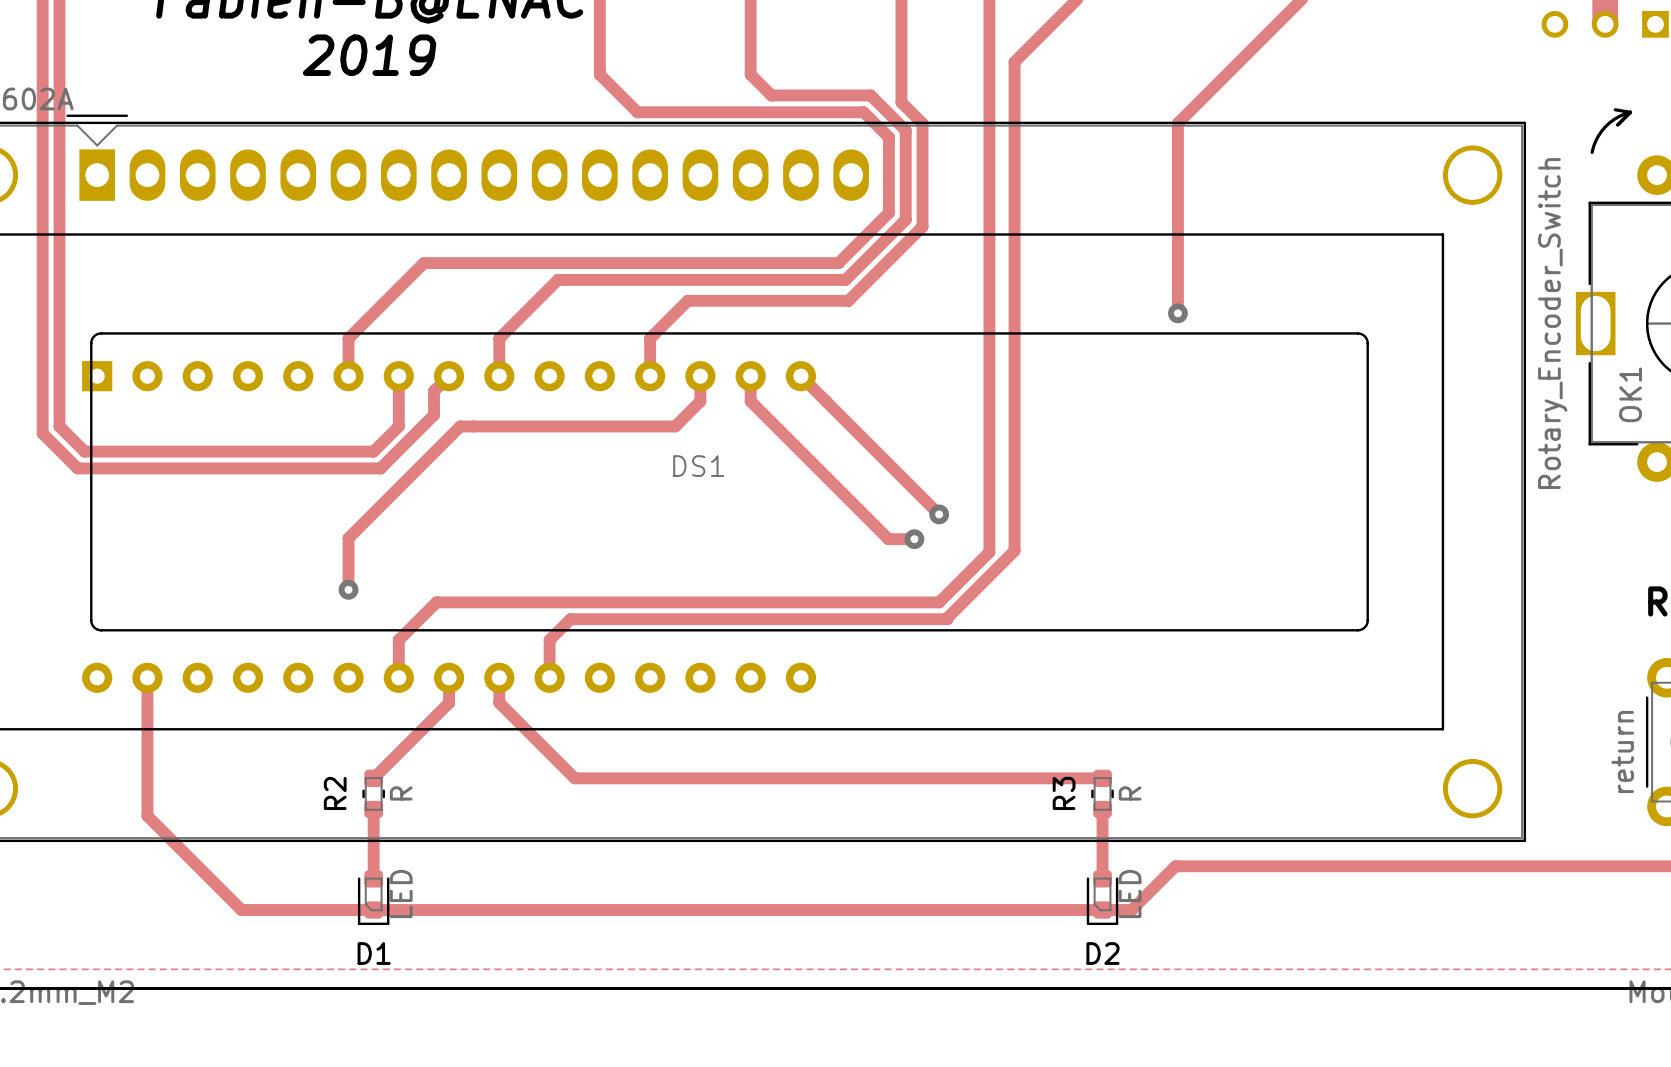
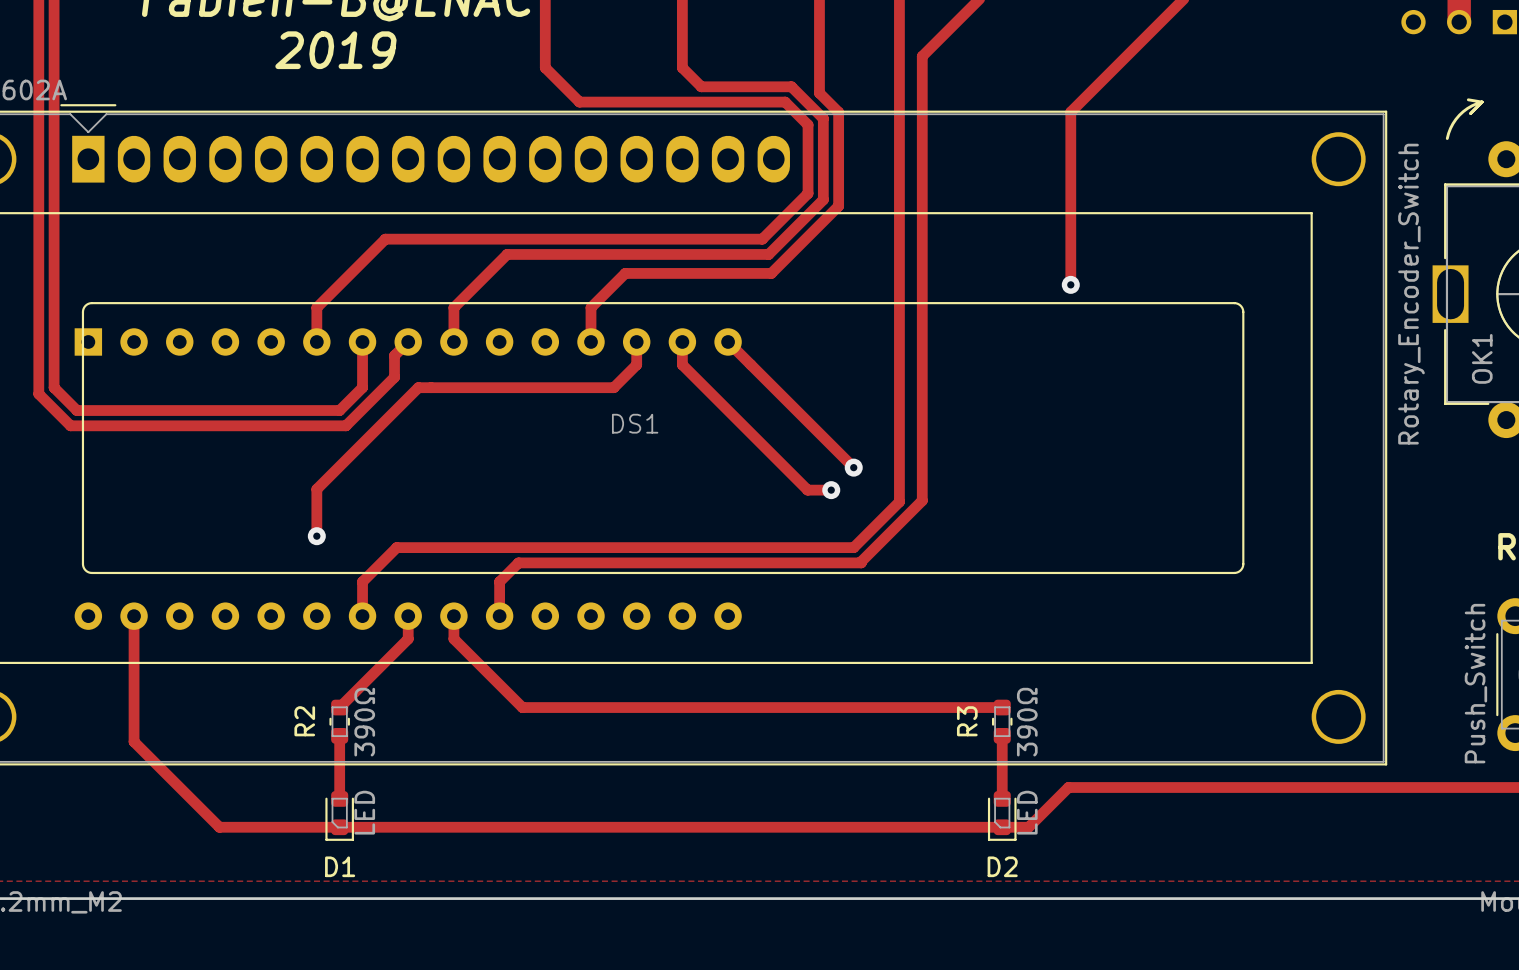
part value: return (1622, 752) -> Push_Switch (1475, 683)
R2 value: R (401, 793) -> 390Ω (364, 722)
R3 value: R (1130, 793) -> 390Ω (1027, 722)

